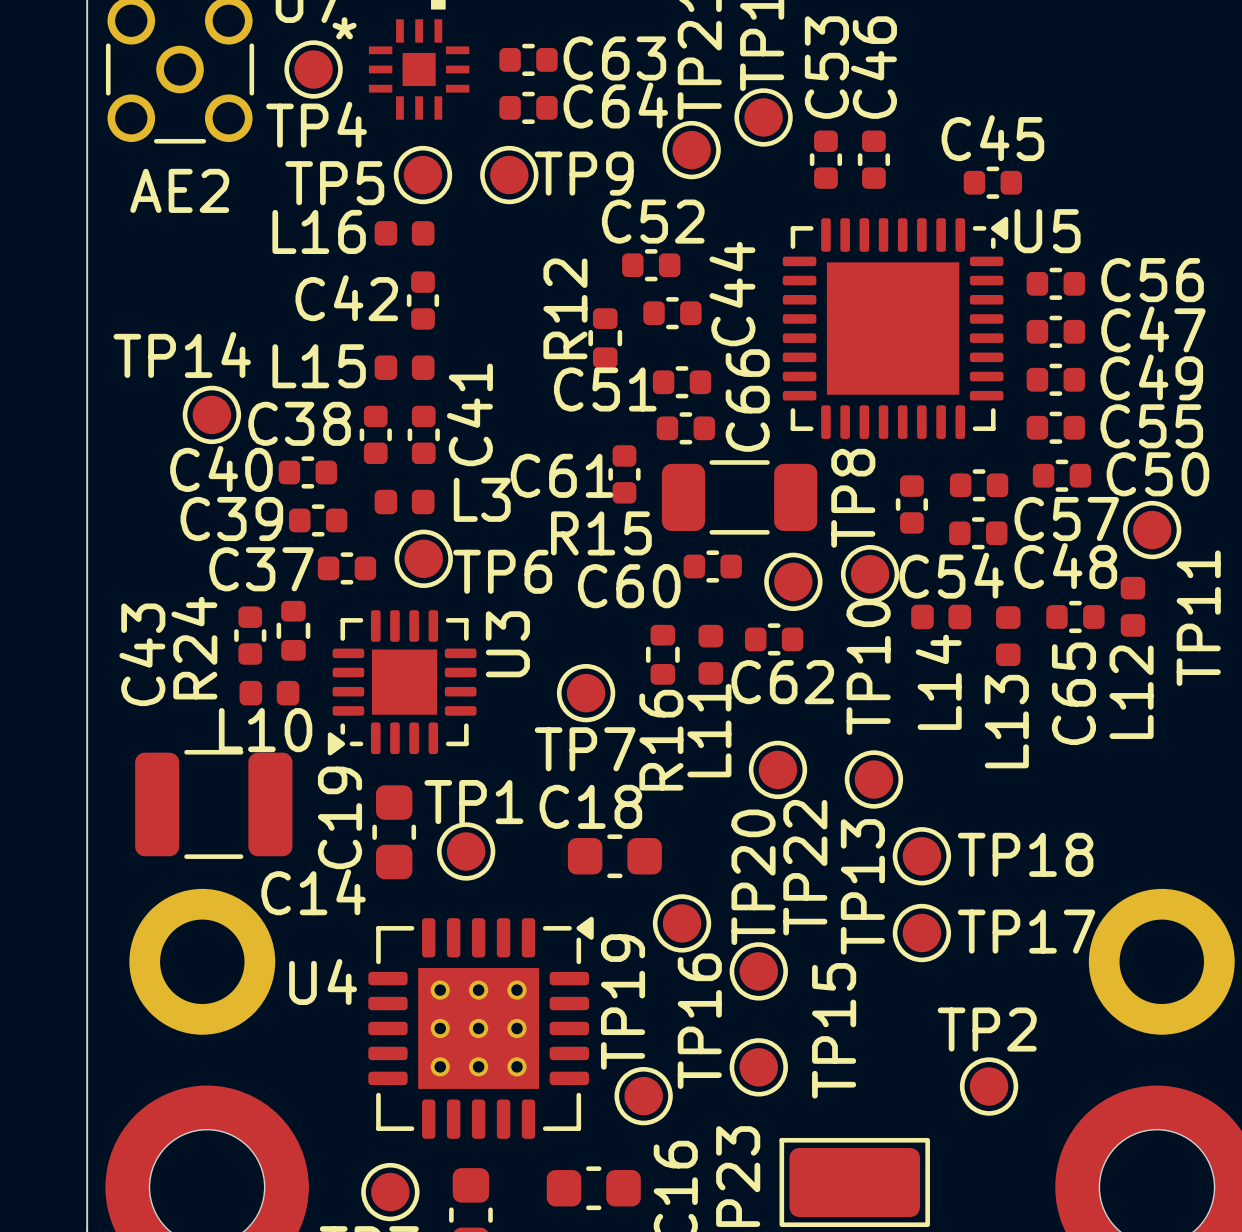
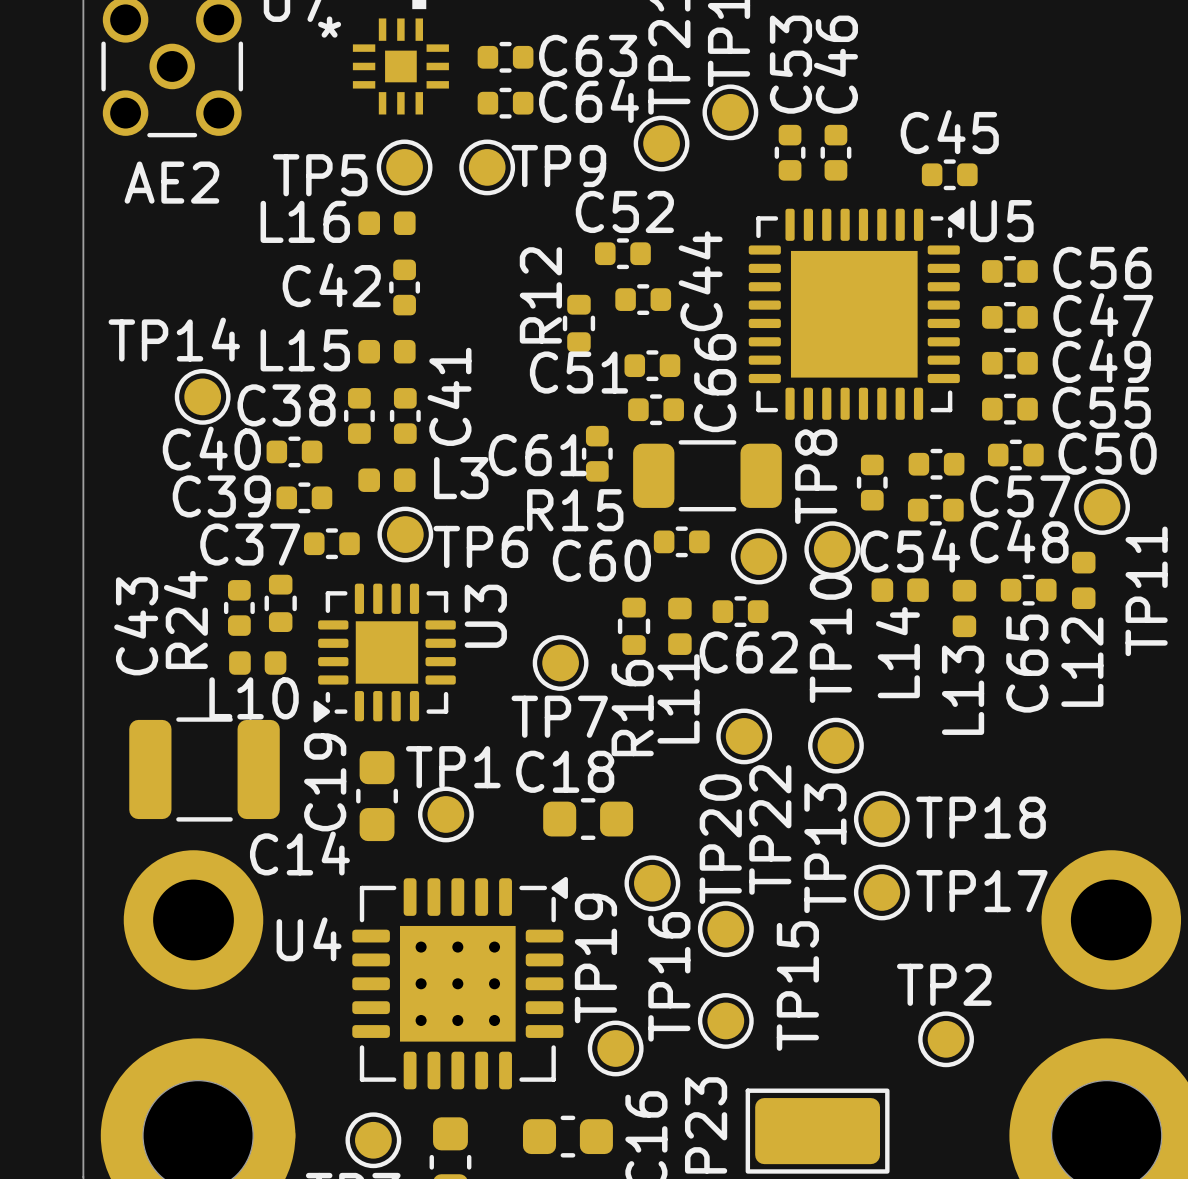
TP4: (313, 69) -> none

